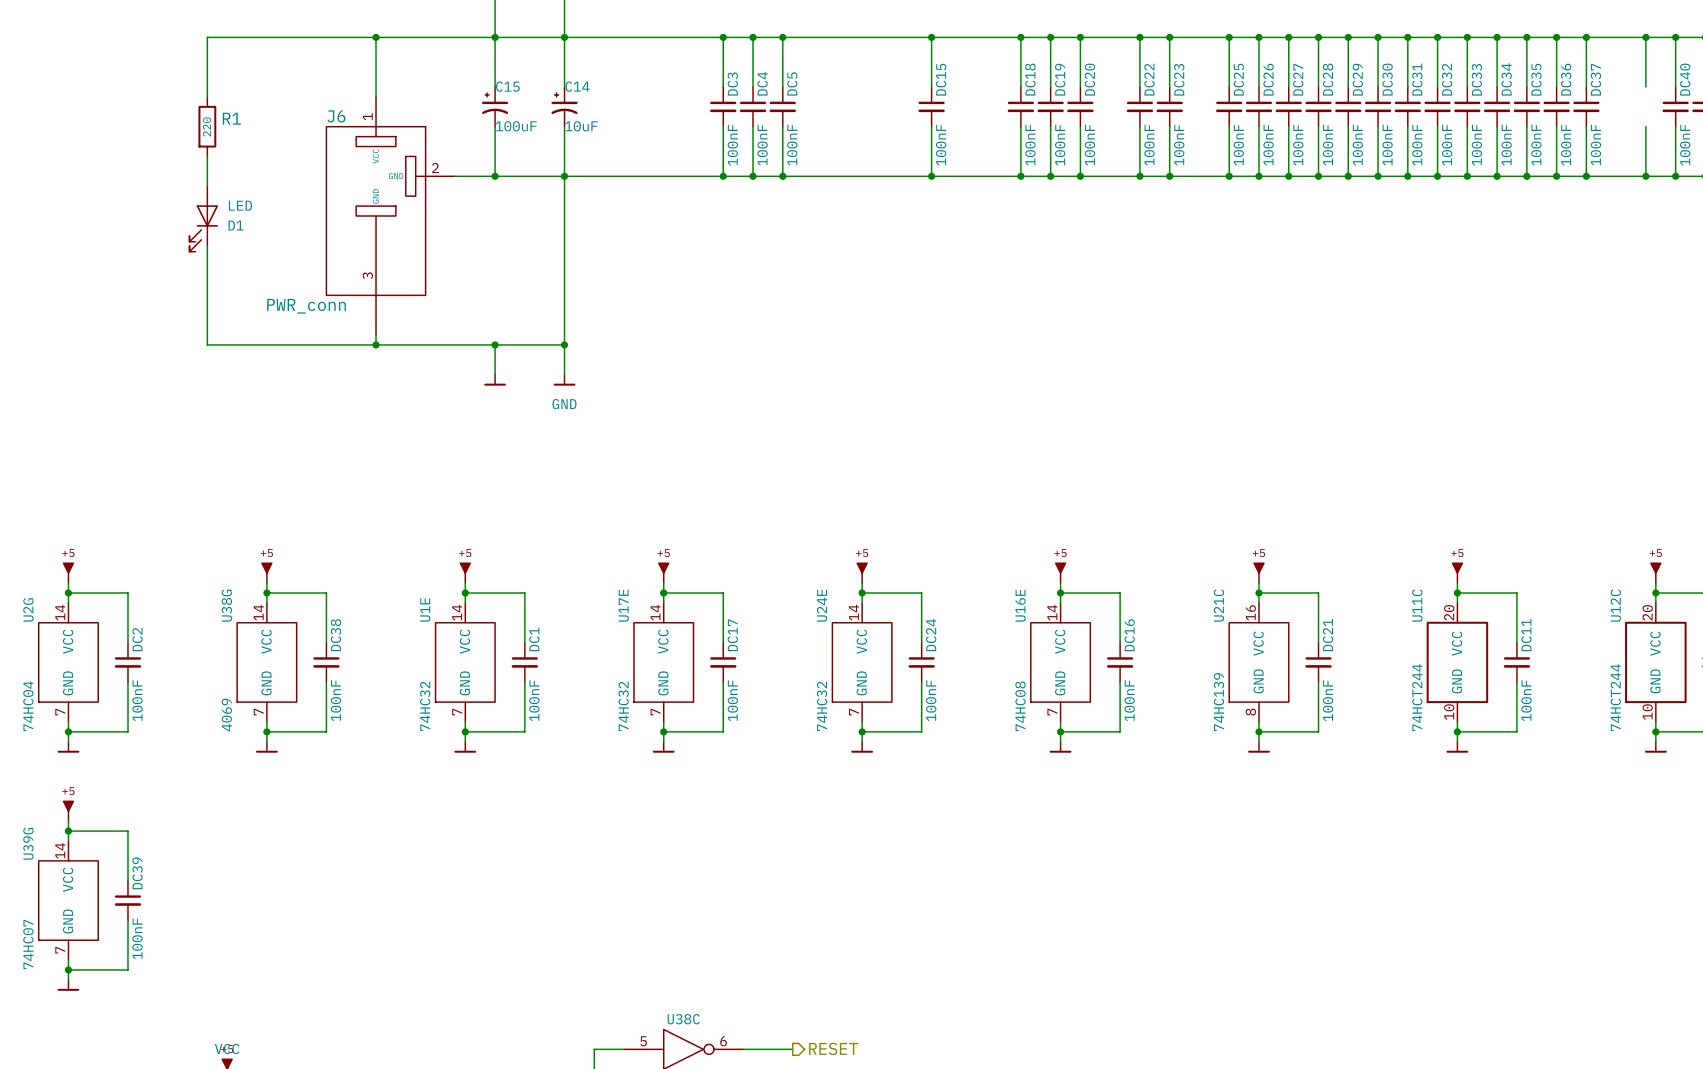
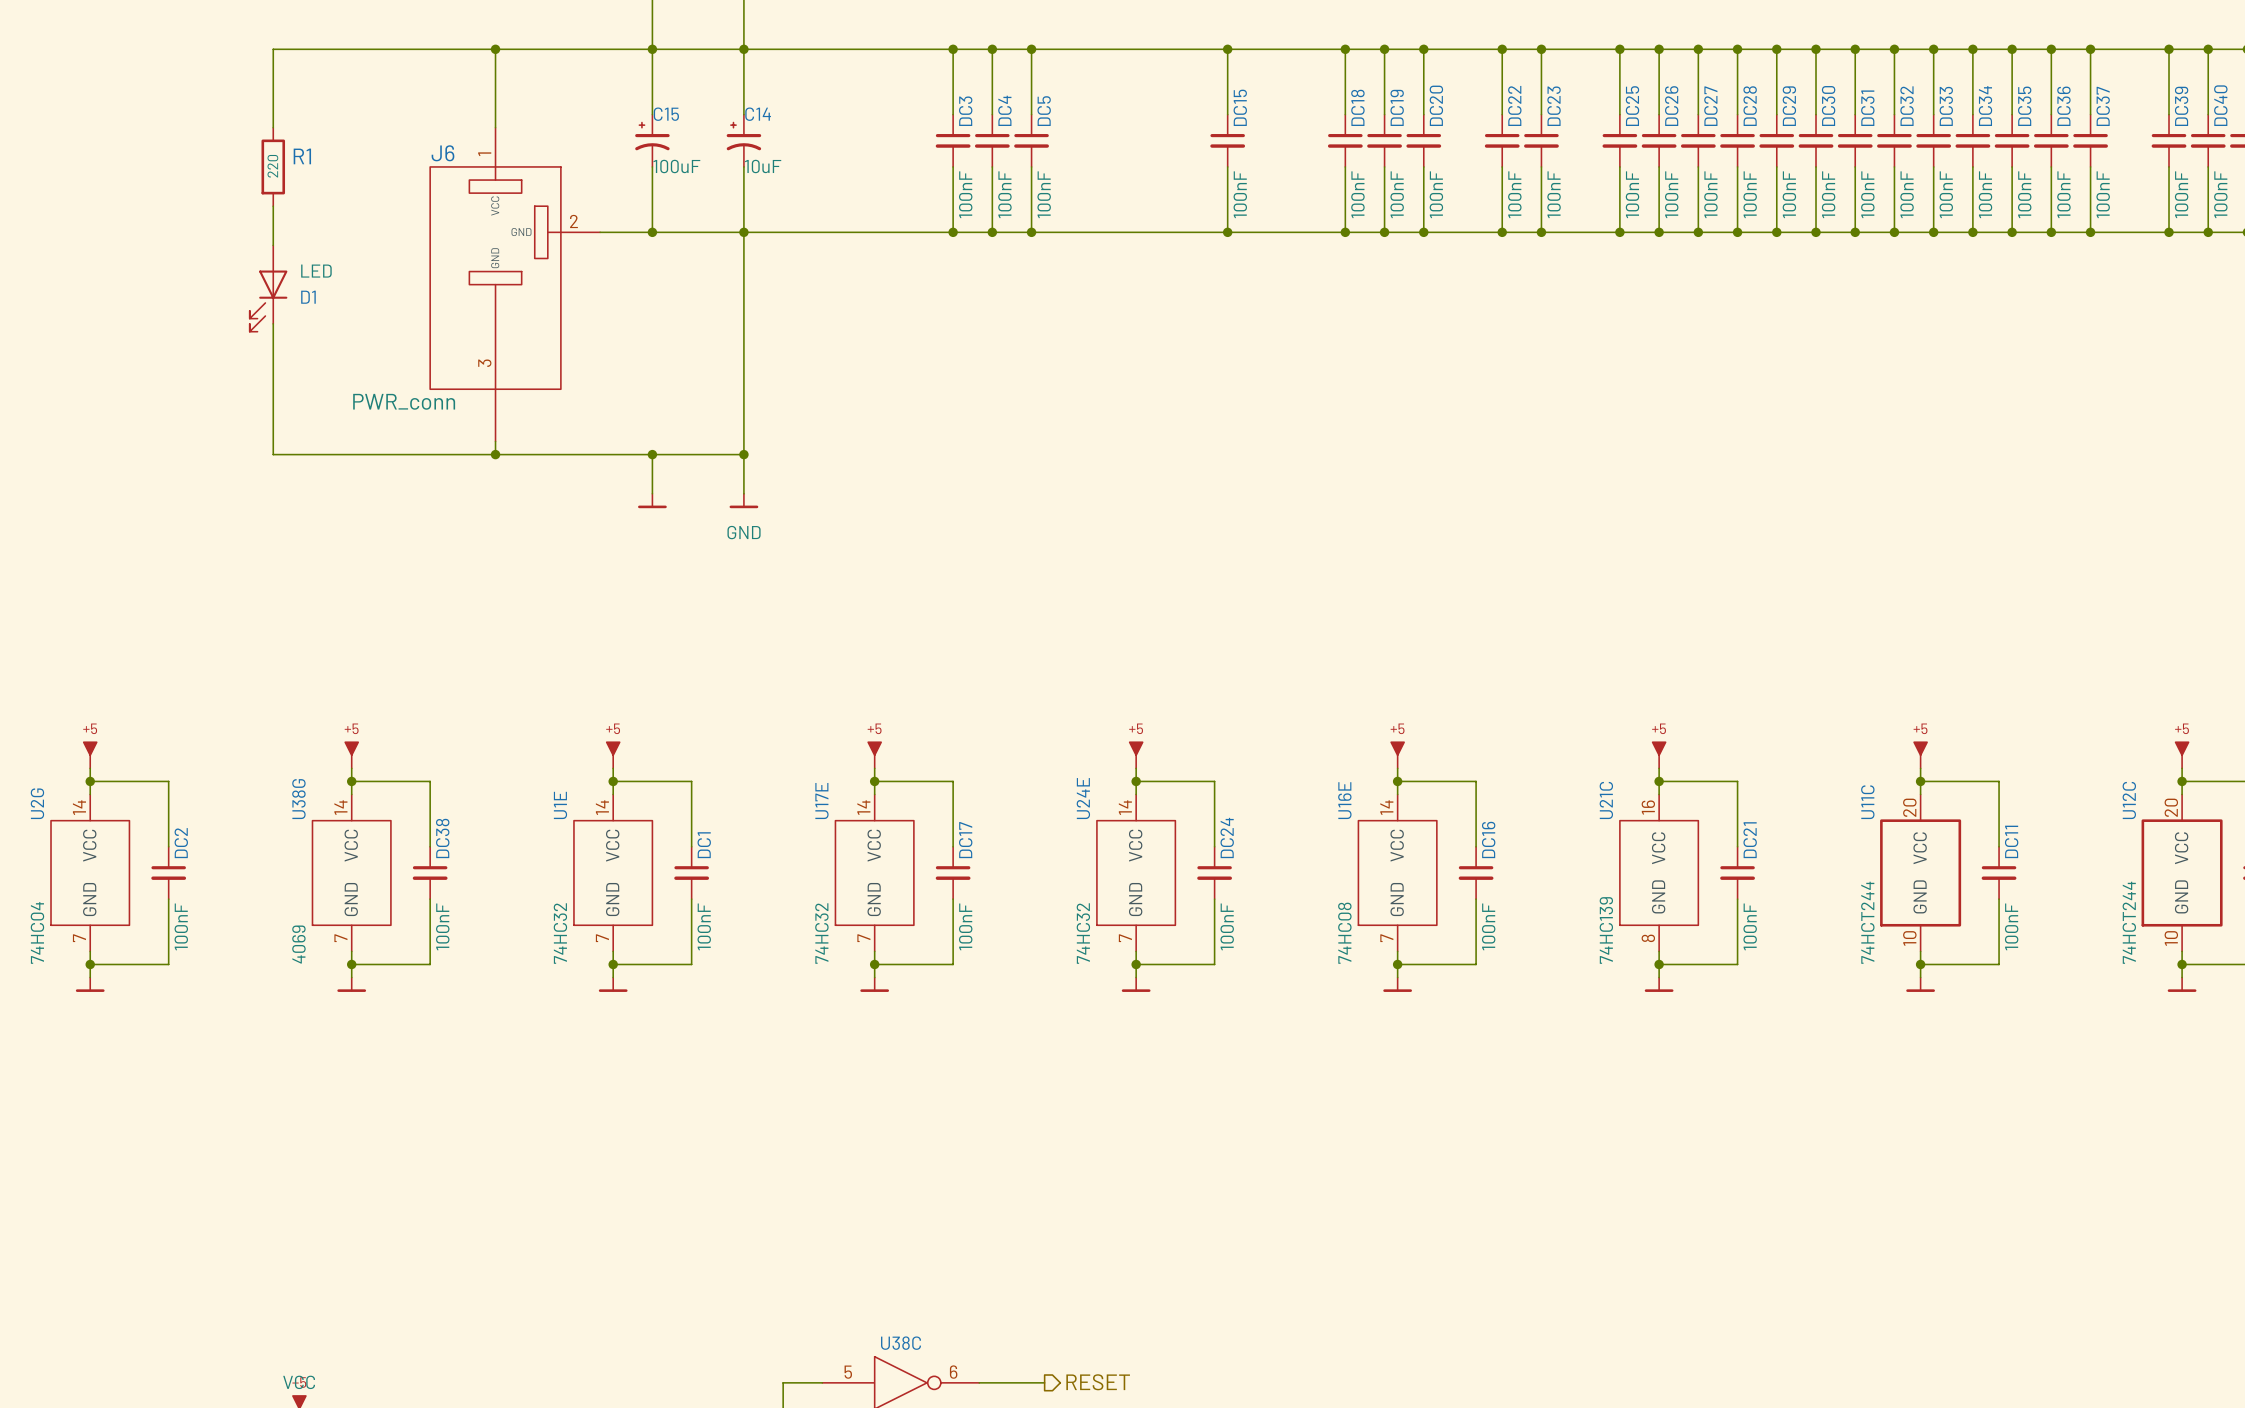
power symbol: (68, 811) -> none
wire: (68, 821) (68, 841) -> none
wire: (68, 831) (127, 831) (127, 880) -> none
junction: (68, 831) -> none
U39G: 74HC07 (68, 900) -> none
DC39 position: (127, 900) -> (2169, 140)
wire: (127, 920) (127, 969) (68, 969) -> none
wire: (68, 960) (68, 979) -> none
junction: (68, 969) -> none
power symbol: (68, 985) -> none

